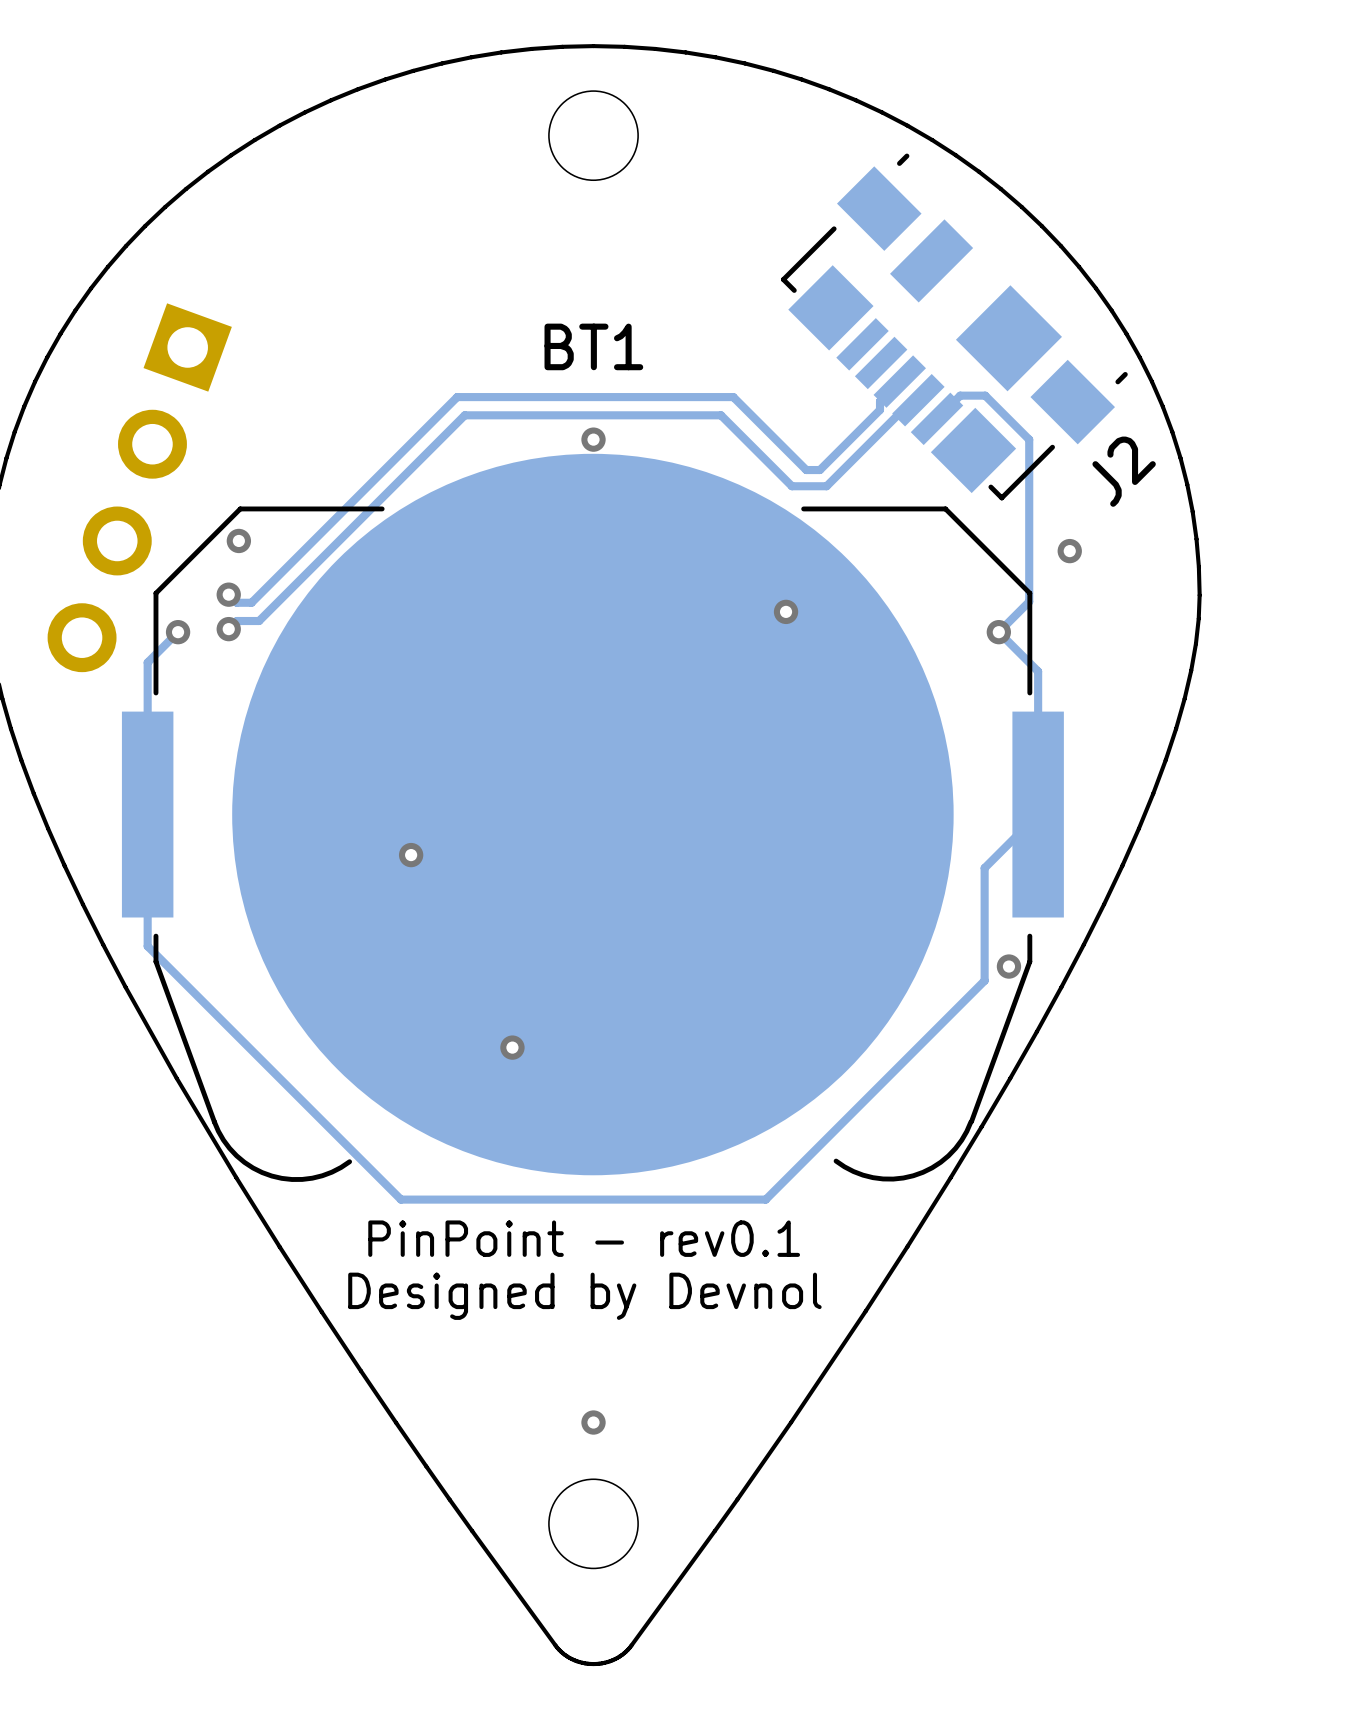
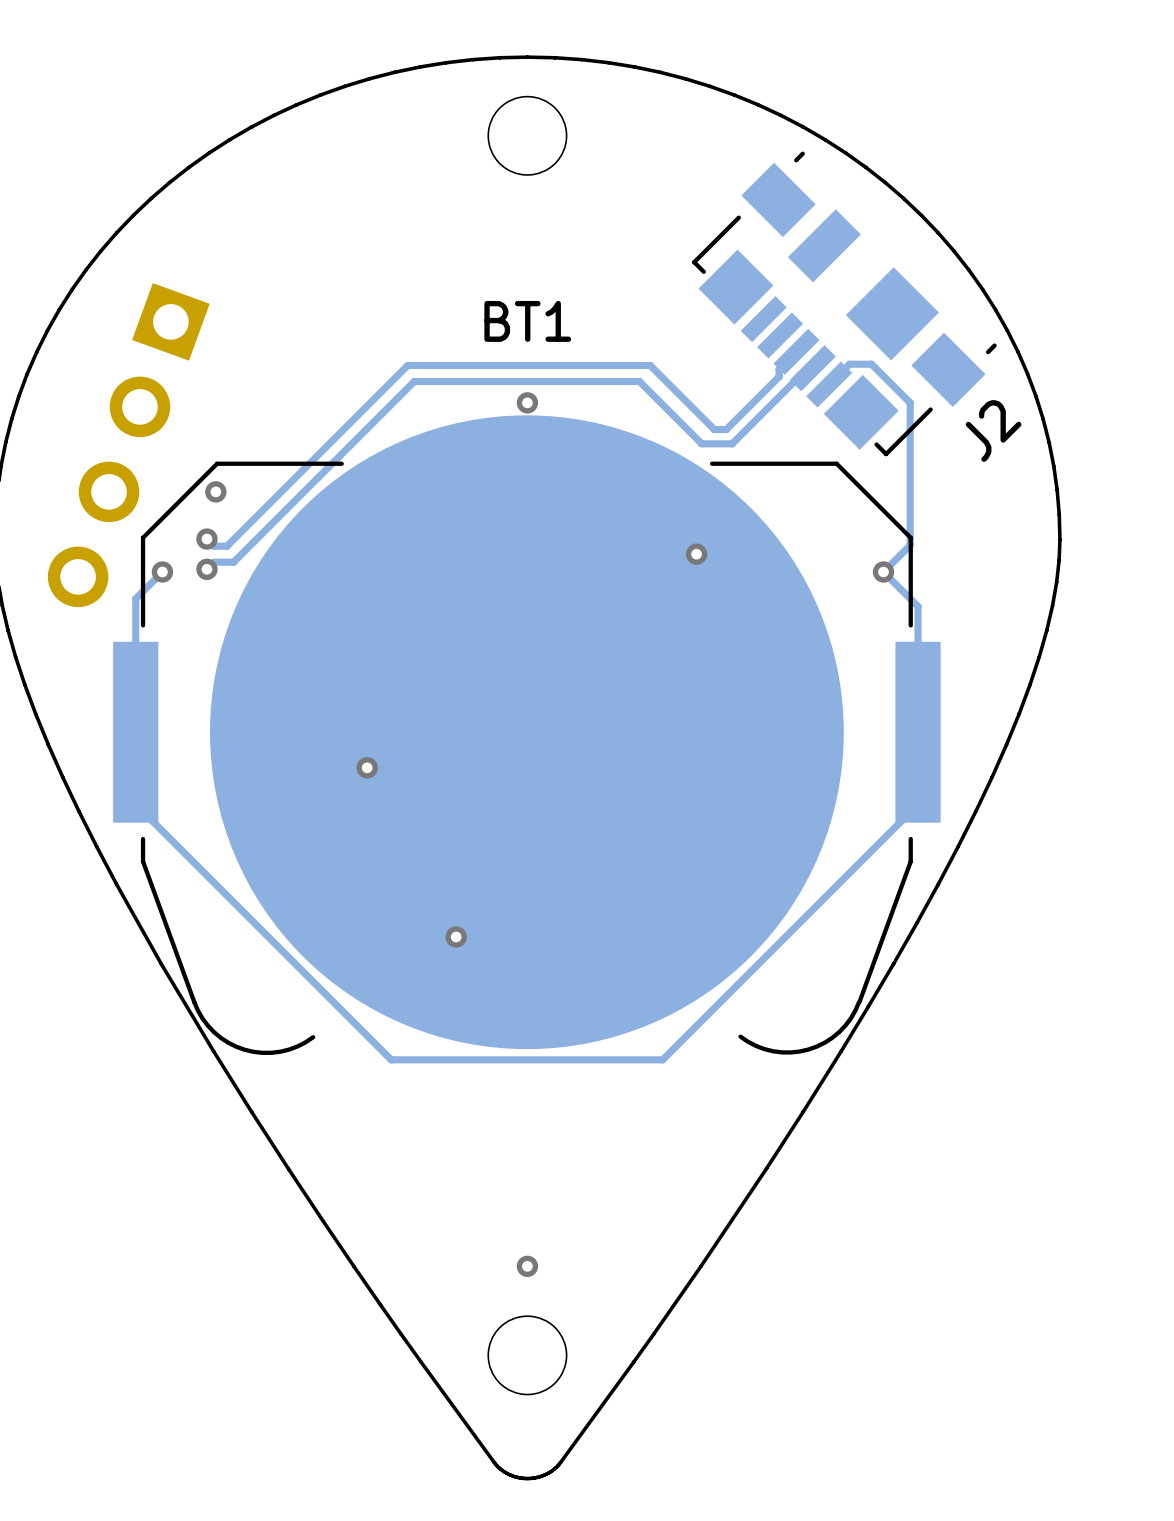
via: (1069, 551) -> none
track: (1038, 814) (984, 868) (984, 980) (765, 1199) (400, 1199) (147, 946) (147, 896) -> (918, 732) (918, 804) (662, 1059) (391, 1059) (135, 804)
via: (1008, 966) -> none
text: PinPoint - rev0.1 (584, 1238) -> none
text: Designed by Devnol (584, 1296) -> none

